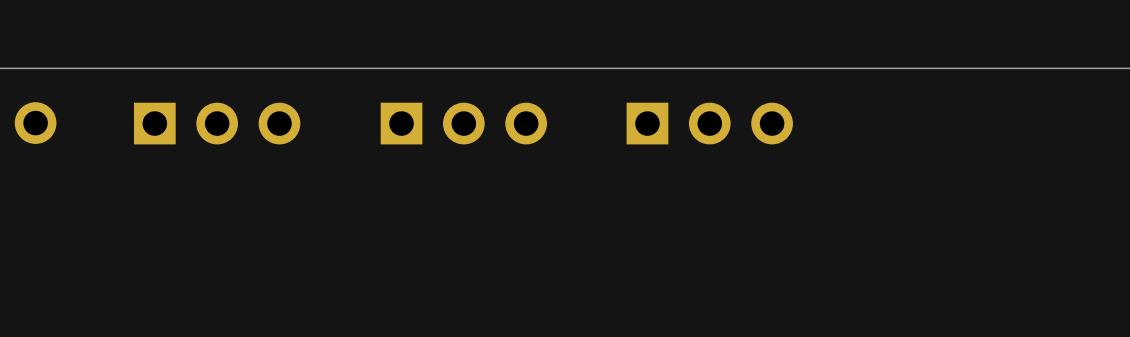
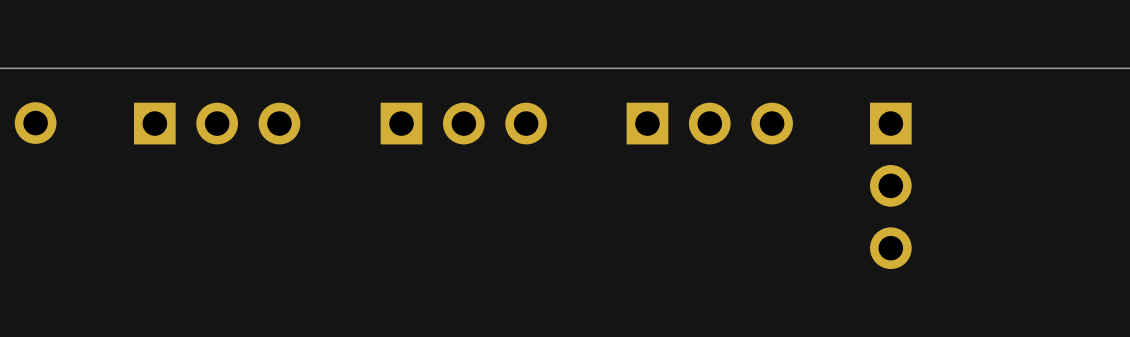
part: none -> (890, 185)

